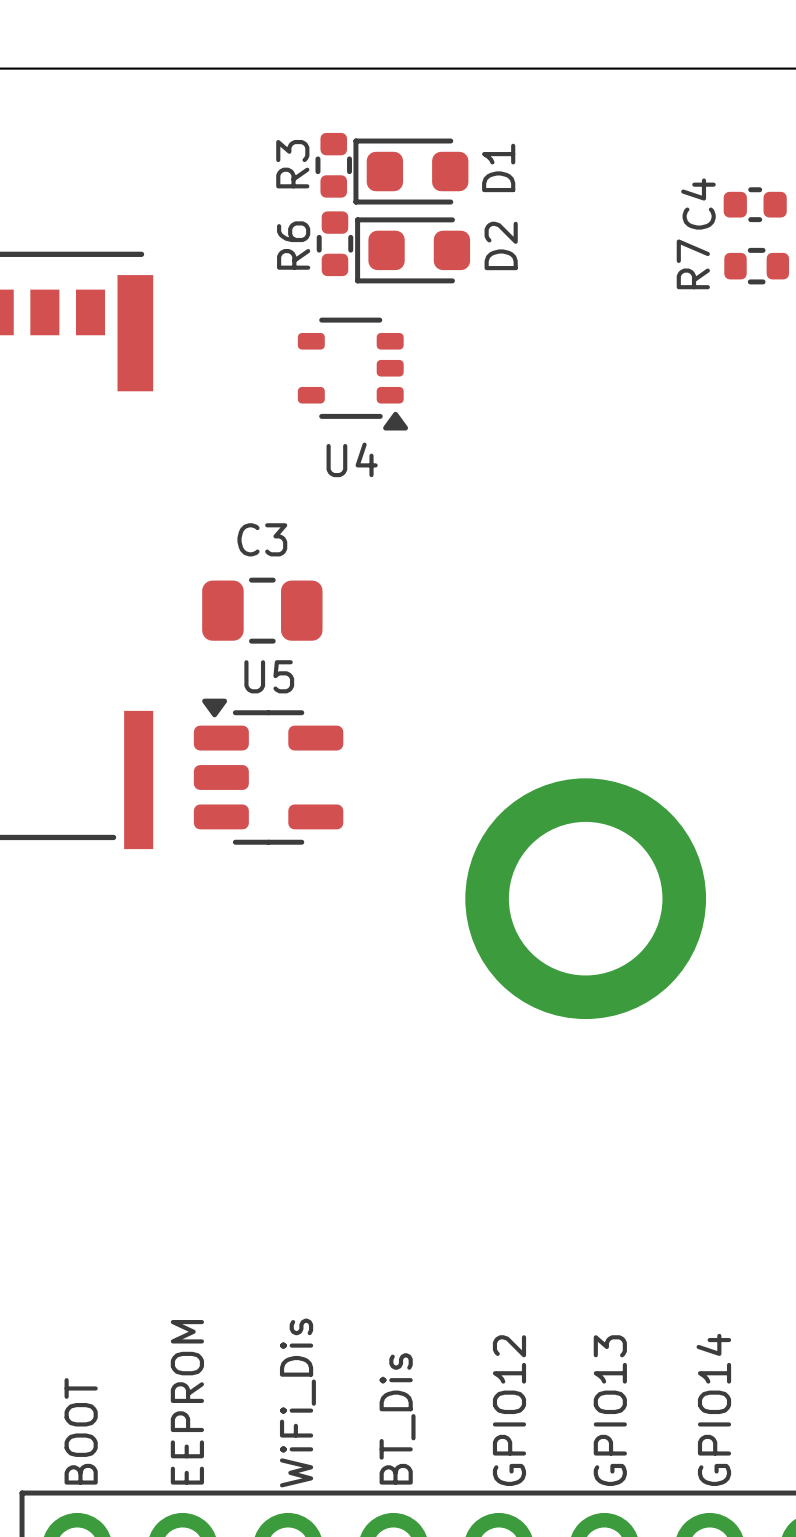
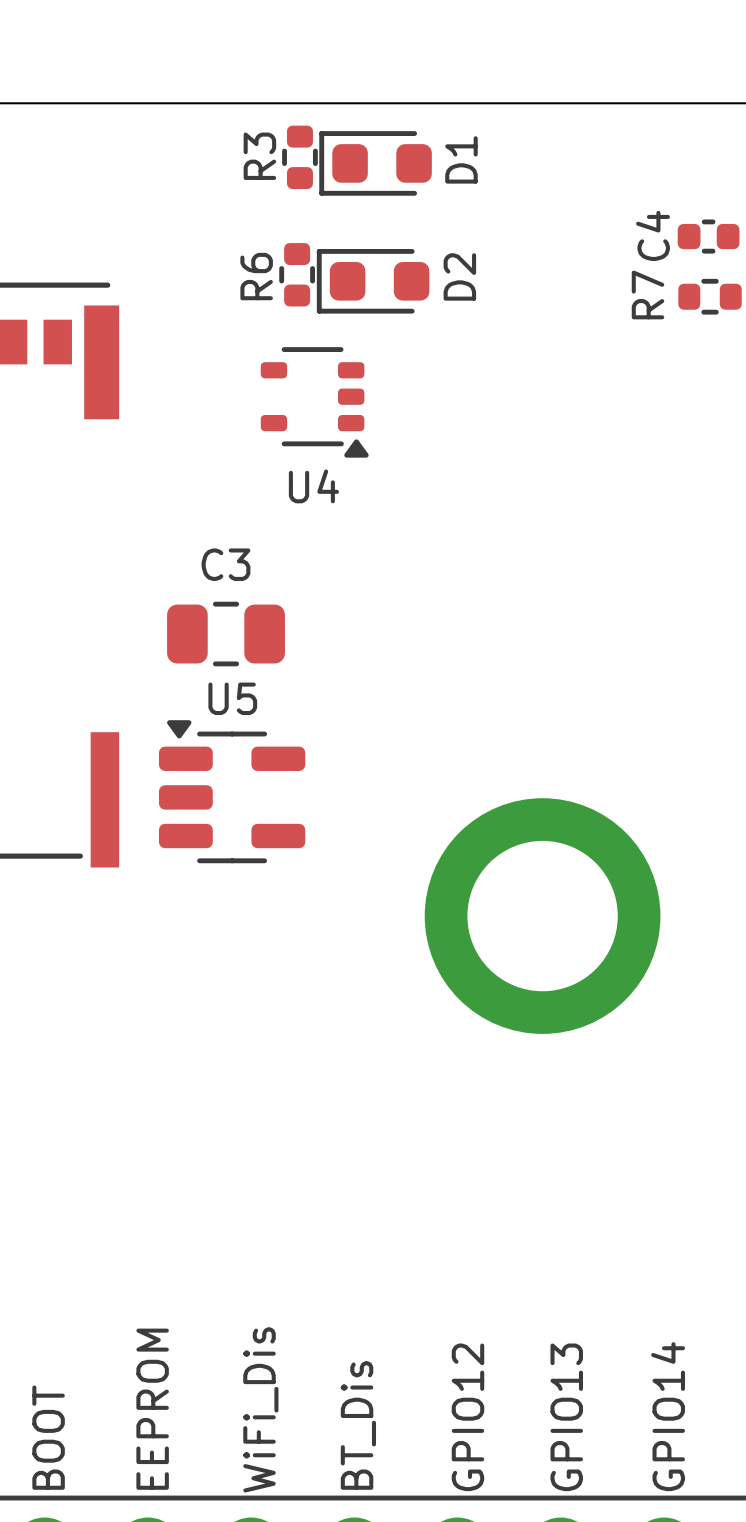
R3 position: (333, 165) -> (299, 157)
D1 position: (410, 171) -> (375, 163)

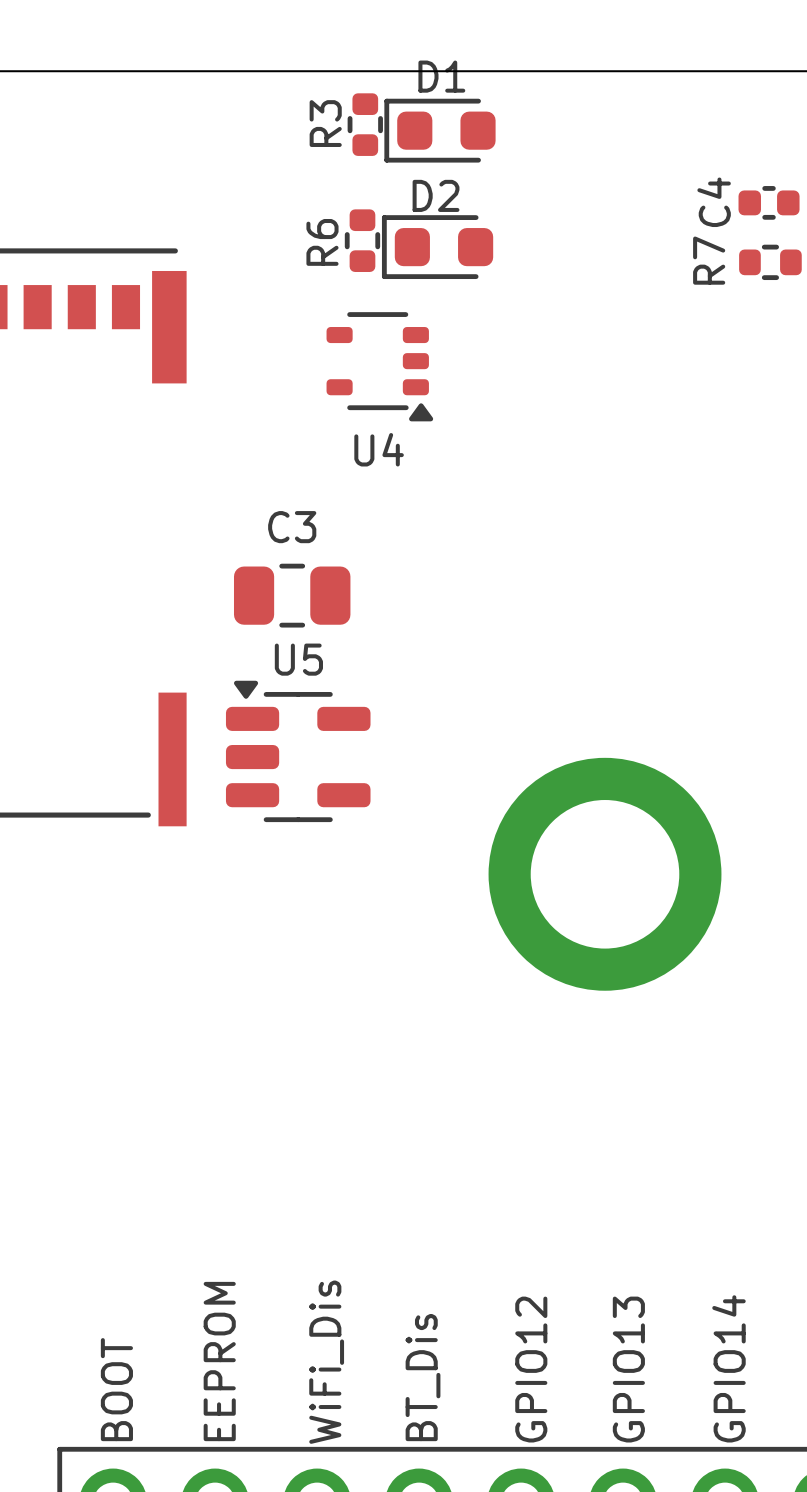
D1 name rotation: 0° (461, 159) -> 90° clockwise (441, 76)
D1 name position: D1 (461, 159) -> D1 (441, 76)
D2 name rotation: 0° (459, 276) -> 90° clockwise (436, 195)
D2 name position: D2 (459, 276) -> D2 (436, 195)

